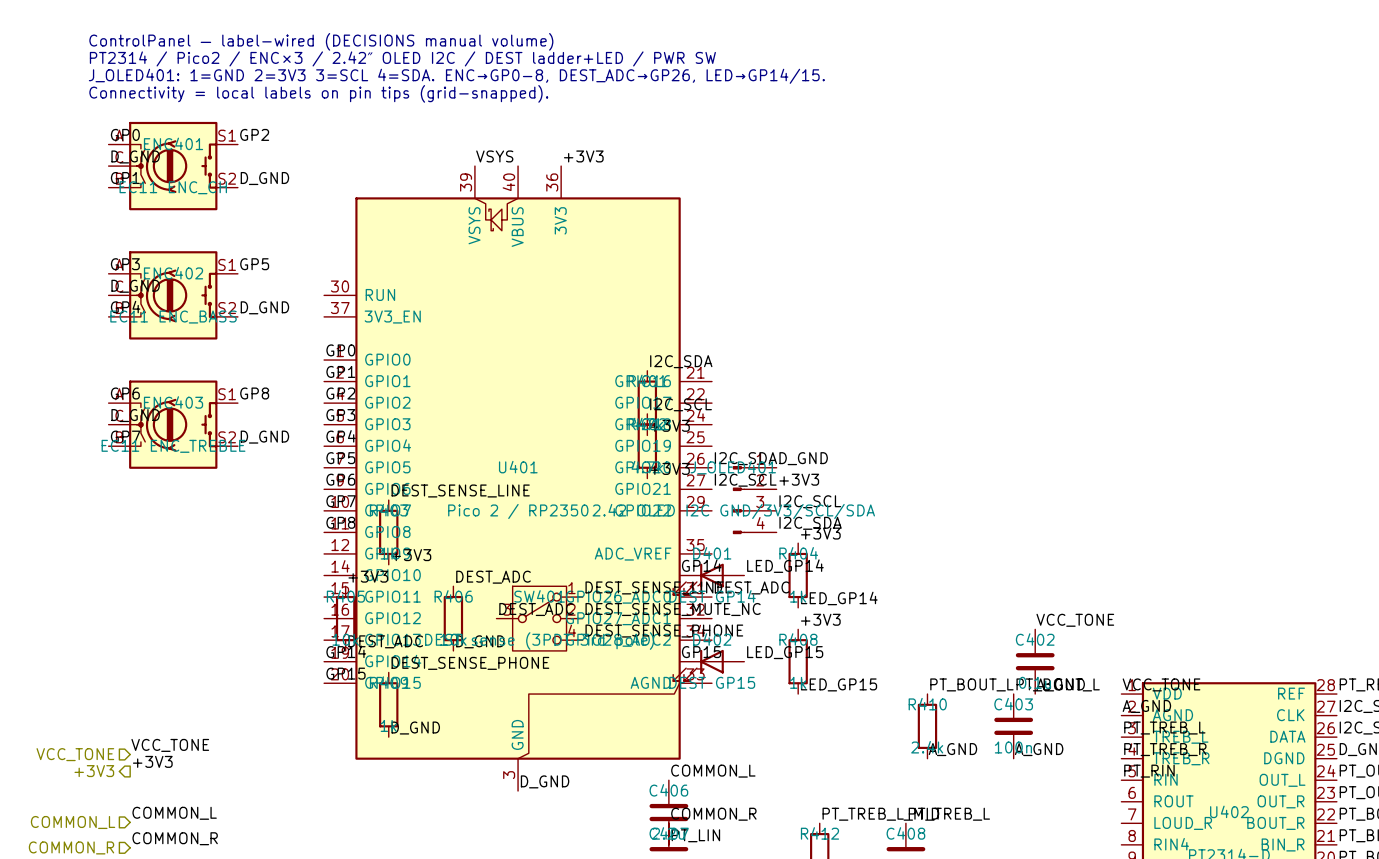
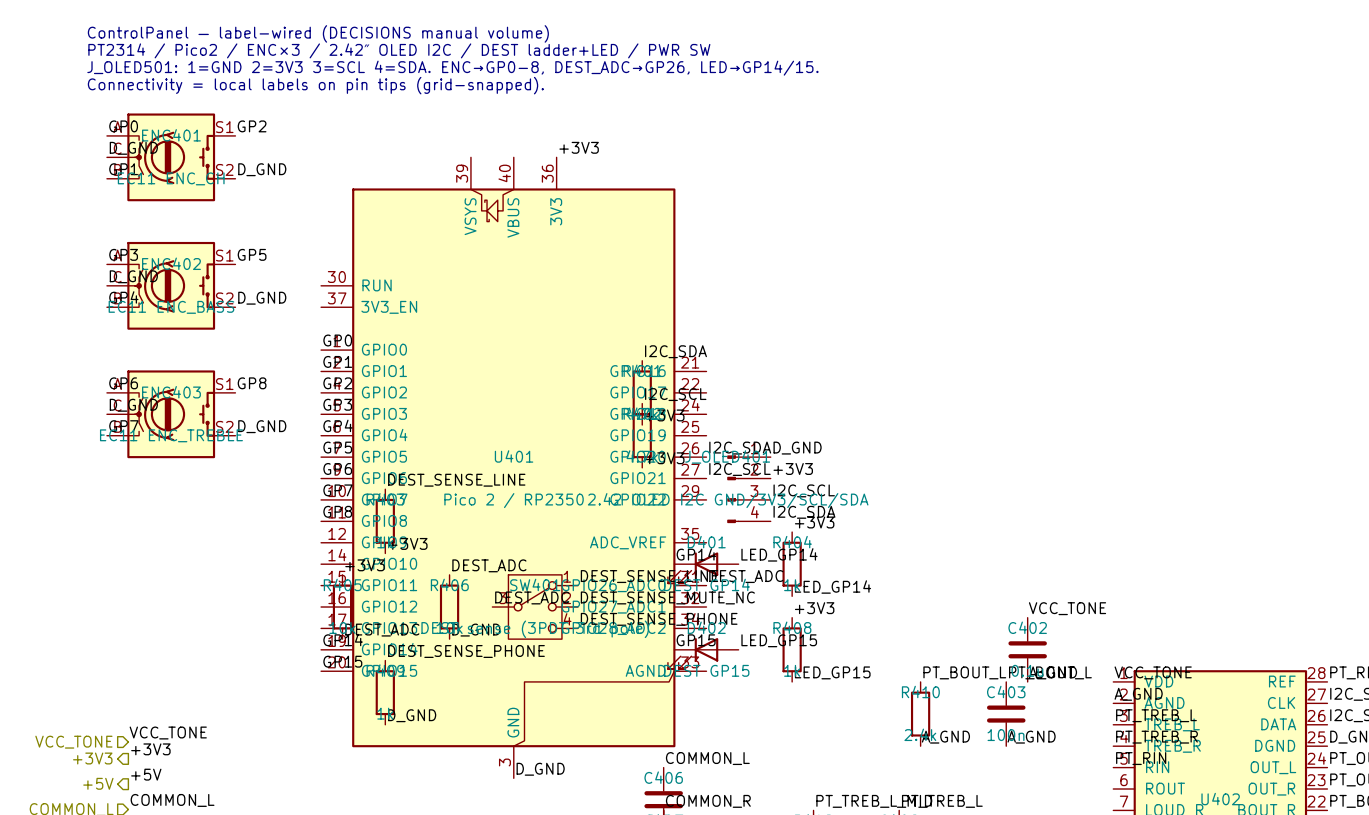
text: J_OLED401: 1=GND 2=3V3 3=SCL 4=SDA. ENC→GP0-8, DEST_ADC→GP26, LED→GP14/15. (456, 76) -> J_OLED501: 1=GND 2=3V3 3=SCL 4=SDA. ENC→GP0-8, DEST_ADC→GP26, LED→GP14/15. (452, 68)
label: VSYS (494, 156) -> none
label: none -> +5V (146, 774)
hierarchical label: none -> +5V (98, 783)

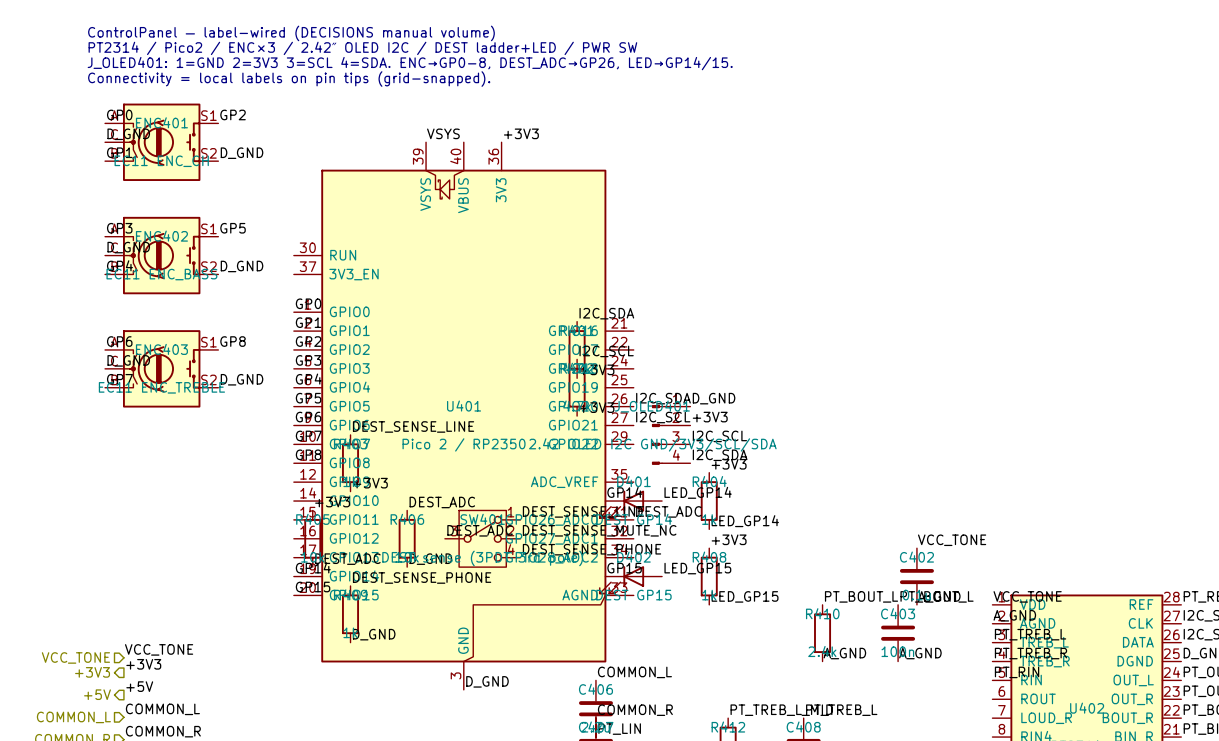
text: J_OLED501: 1=GND 2=3V3 3=SCL 4=SDA. ENC→GP0-8, DEST_ADC→GP26, LED→GP14/15. (452, 68) -> J_OLED401: 1=GND 2=3V3 3=SCL 4=SDA. ENC→GP0-8, DEST_ADC→GP26, LED→GP14/15. (410, 63)
label: none -> VSYS (443, 133)

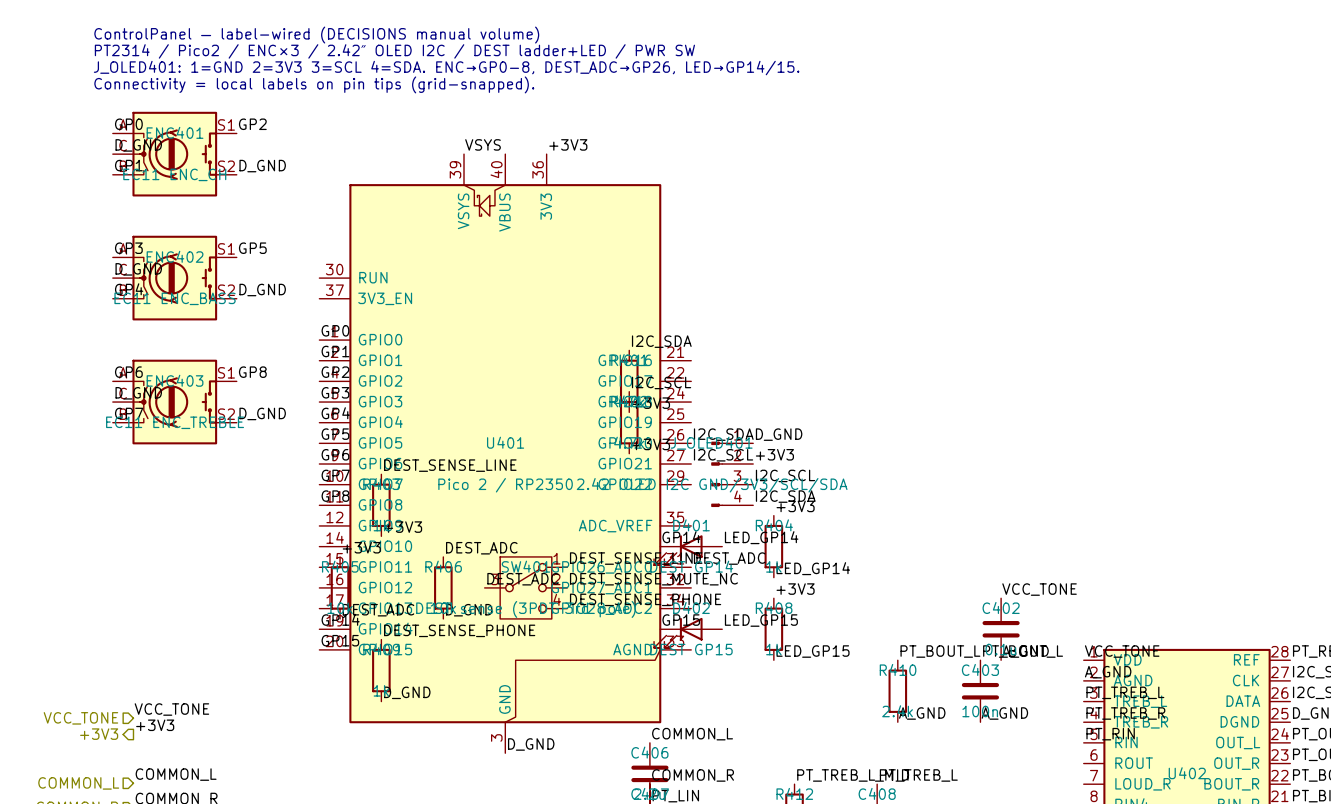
label: +5V (139, 686) -> none
hierarchical label: +5V (97, 694) -> none

